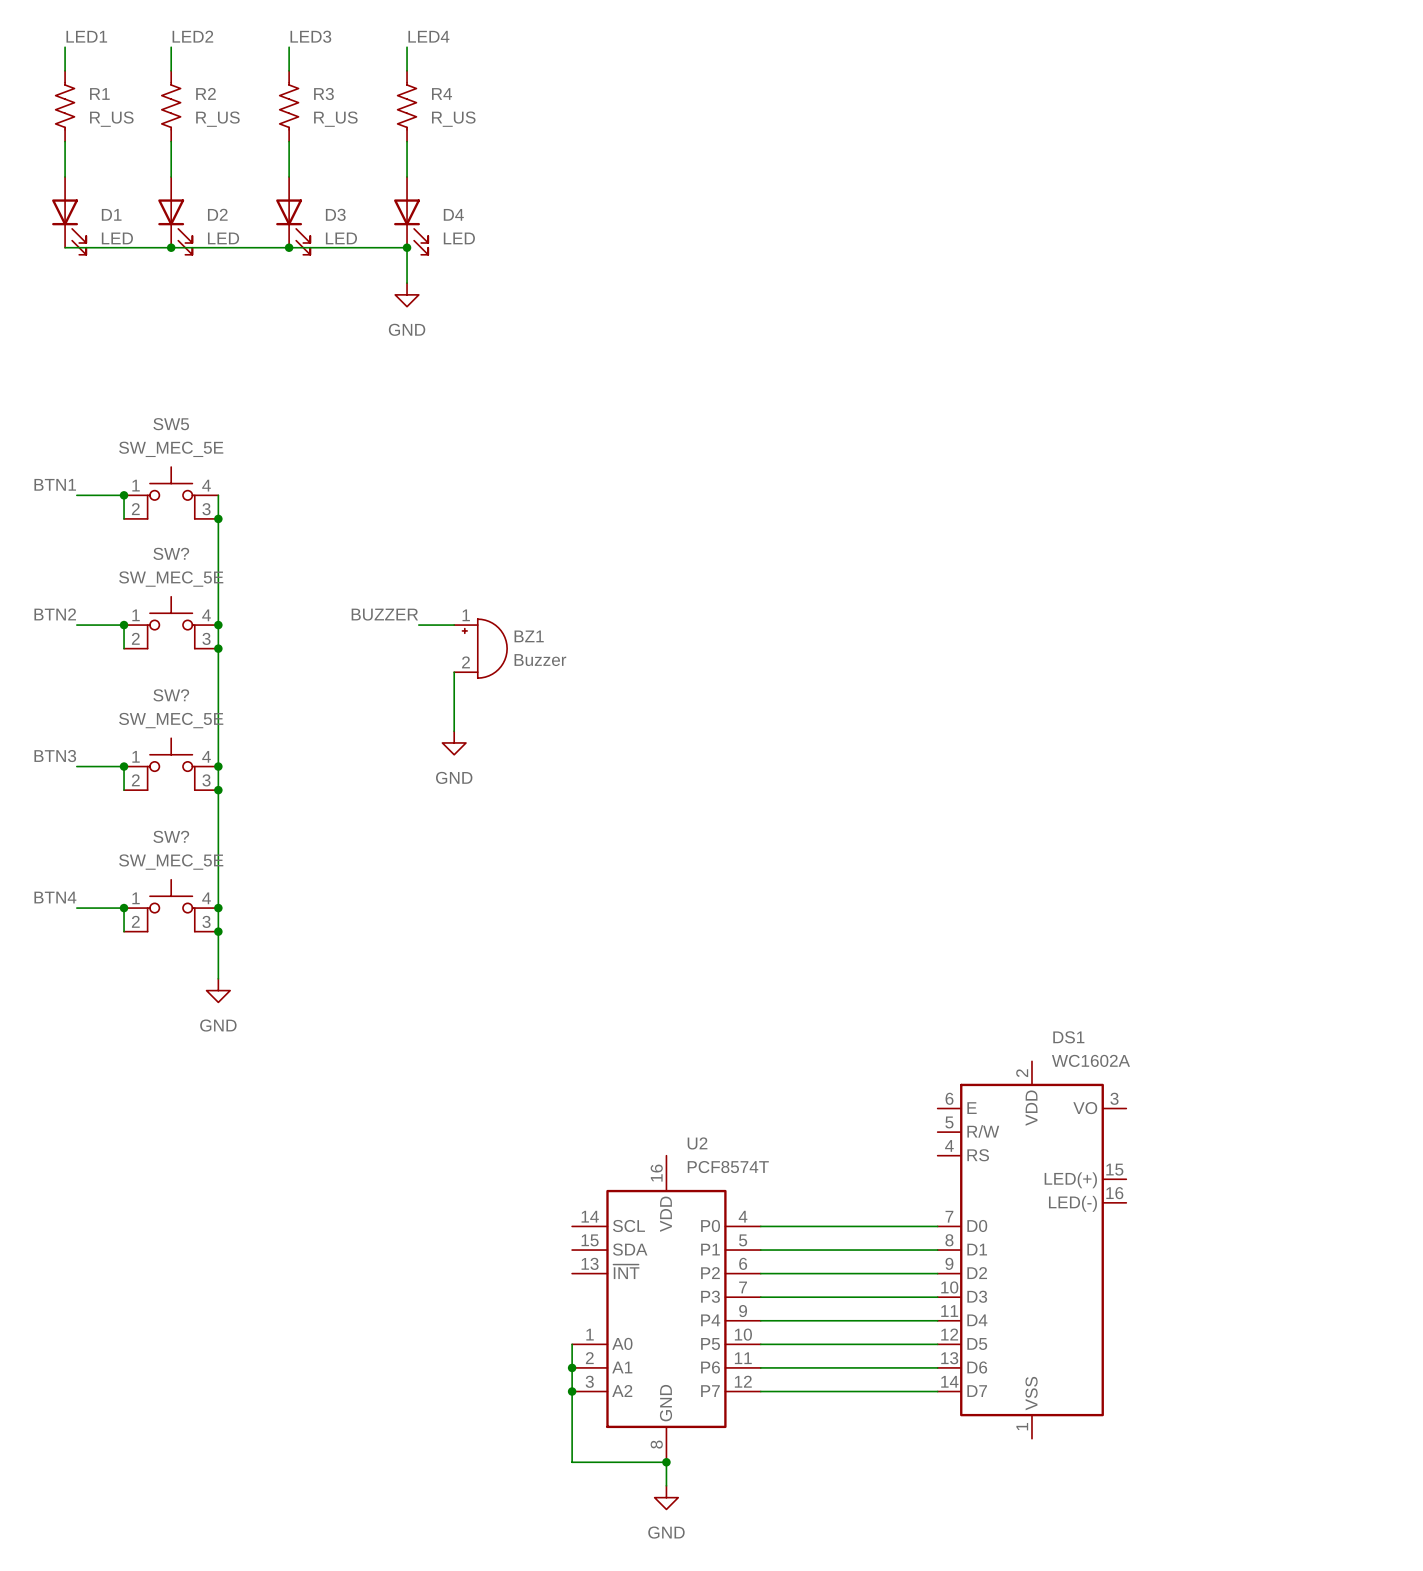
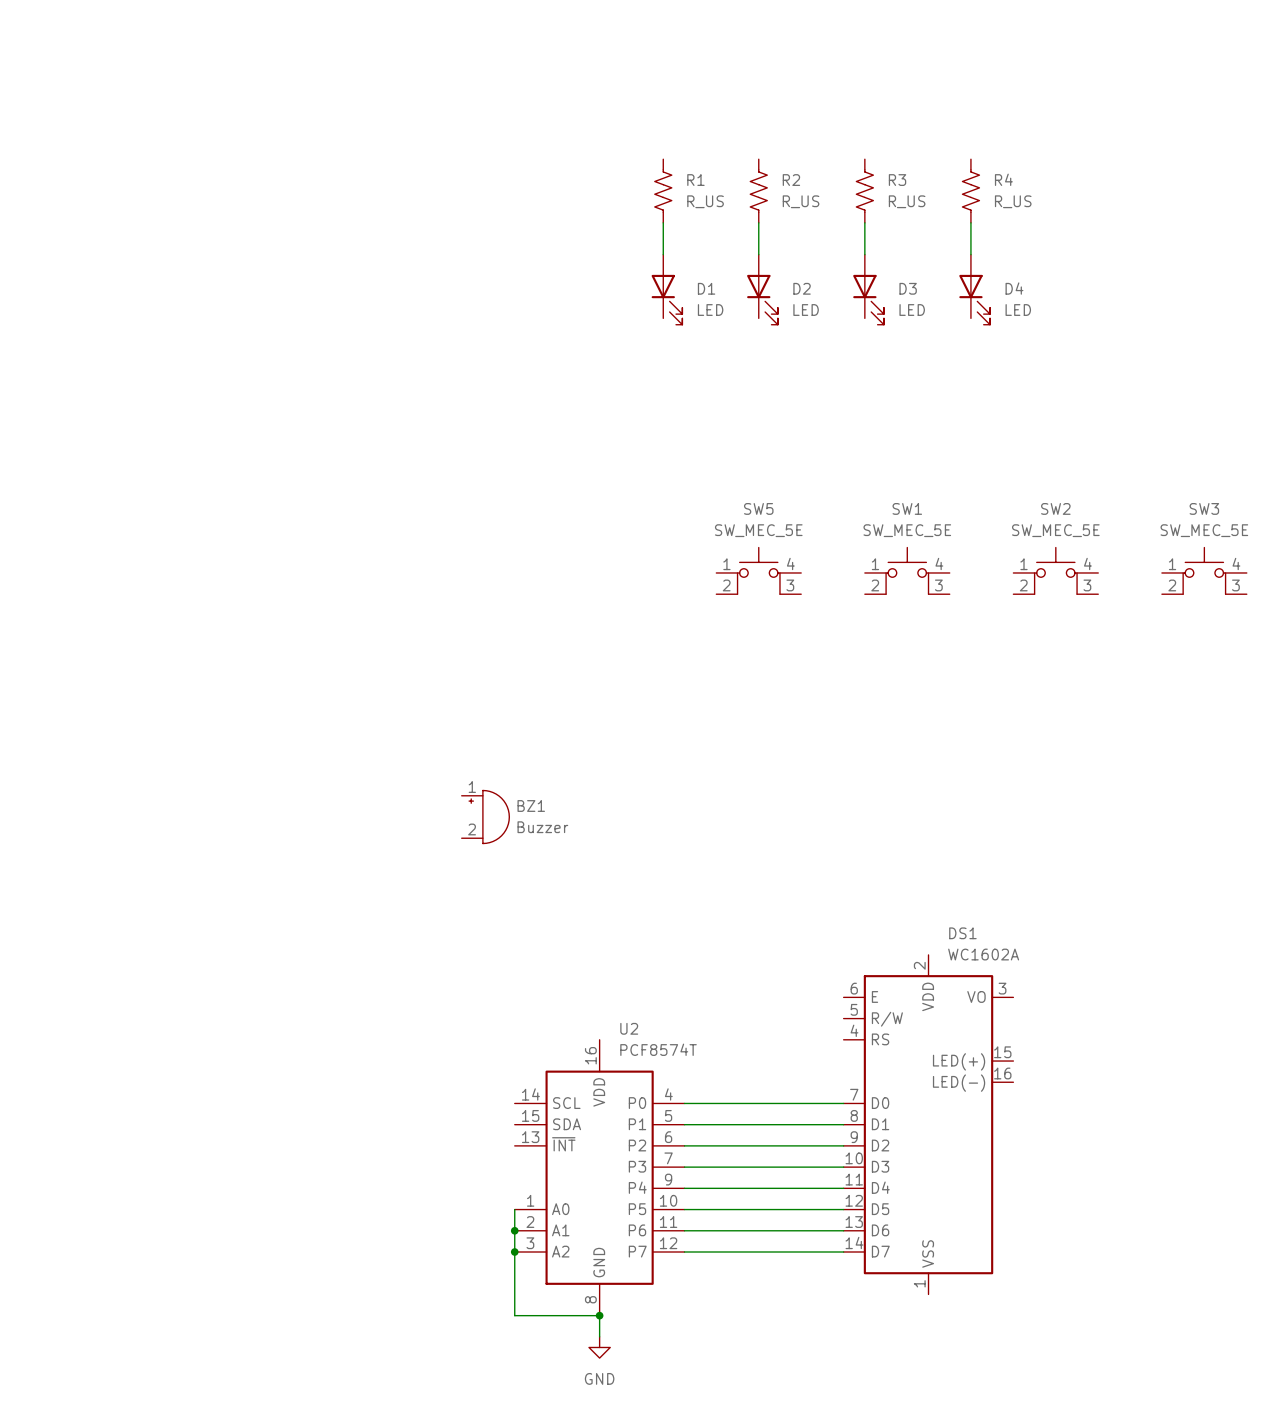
label: LED1 (86, 36) -> none
label: LED2 (192, 36) -> none
label: LED3 (310, 36) -> none
label: LED4 (428, 36) -> none
wire: (65, 47) (65, 70) -> none
wire: (171, 47) (171, 70) -> none
wire: (289, 47) (289, 70) -> none
wire: (407, 47) (407, 70) -> none
R1 position: (65, 106) -> (663, 191)
R2 position: (171, 106) -> (758, 191)
R3 position: (289, 106) -> (864, 191)
R4 position: (407, 106) -> (970, 191)
wire: (65, 141) (65, 176) -> none
wire: (171, 141) (171, 176) -> none
wire: (289, 141) (289, 176) -> none
wire: (407, 141) (407, 176) -> none
D1 position: (69, 215) -> (666, 289)
D2 position: (175, 215) -> (762, 289)
D3 position: (293, 215) -> (868, 289)
D4 position: (411, 215) -> (974, 289)
wire: (65, 247) (407, 247) (407, 283) -> none
junction: (171, 247) -> none
junction: (289, 247) -> none
junction: (407, 247) -> none
wire: none -> (663, 222) (663, 254)
wire: none -> (758, 222) (758, 254)
wire: none -> (864, 222) (864, 254)
wire: none -> (970, 222) (970, 254)
power symbol: GND (407, 294) -> none
label: BTN1 (55, 484) -> none
SW5 position: (171, 492) -> (758, 570)
wire: (76, 495) (124, 495) (124, 518) -> none
junction: (124, 495) -> none
wire: (218, 495) (218, 978) -> none
junction: (218, 518) -> none
label: BTN2 (55, 614) -> none
label: BUZZER (384, 614) -> none
SW?: SW_MEC_5E (171, 622) -> none
wire: (76, 625) (124, 625) (124, 648) -> none
junction: (124, 625) -> none
junction: (218, 625) -> none
wire: (418, 625) (454, 625) -> none
SW1: none -> SW_MEC_5E (907, 570)
SW2: none -> SW_MEC_5E (1055, 570)
SW3: none -> SW_MEC_5E (1204, 570)
junction: (218, 648) -> none
BZ1 position: (480, 648) -> (485, 817)
wire: (454, 672) (454, 731) -> none
power symbol: GND (454, 742) -> none
label: BTN3 (55, 756) -> none
SW?: SW_MEC_5E (171, 764) -> none
wire: (76, 766) (124, 766) (124, 790) -> none
junction: (124, 766) -> none
junction: (218, 766) -> none
junction: (218, 790) -> none
label: BTN4 (55, 897) -> none
SW?: SW_MEC_5E (171, 905) -> none
wire: (76, 908) (124, 908) (124, 931) -> none
junction: (124, 908) -> none
junction: (218, 908) -> none
junction: (218, 931) -> none
power symbol: GND (218, 990) -> none

